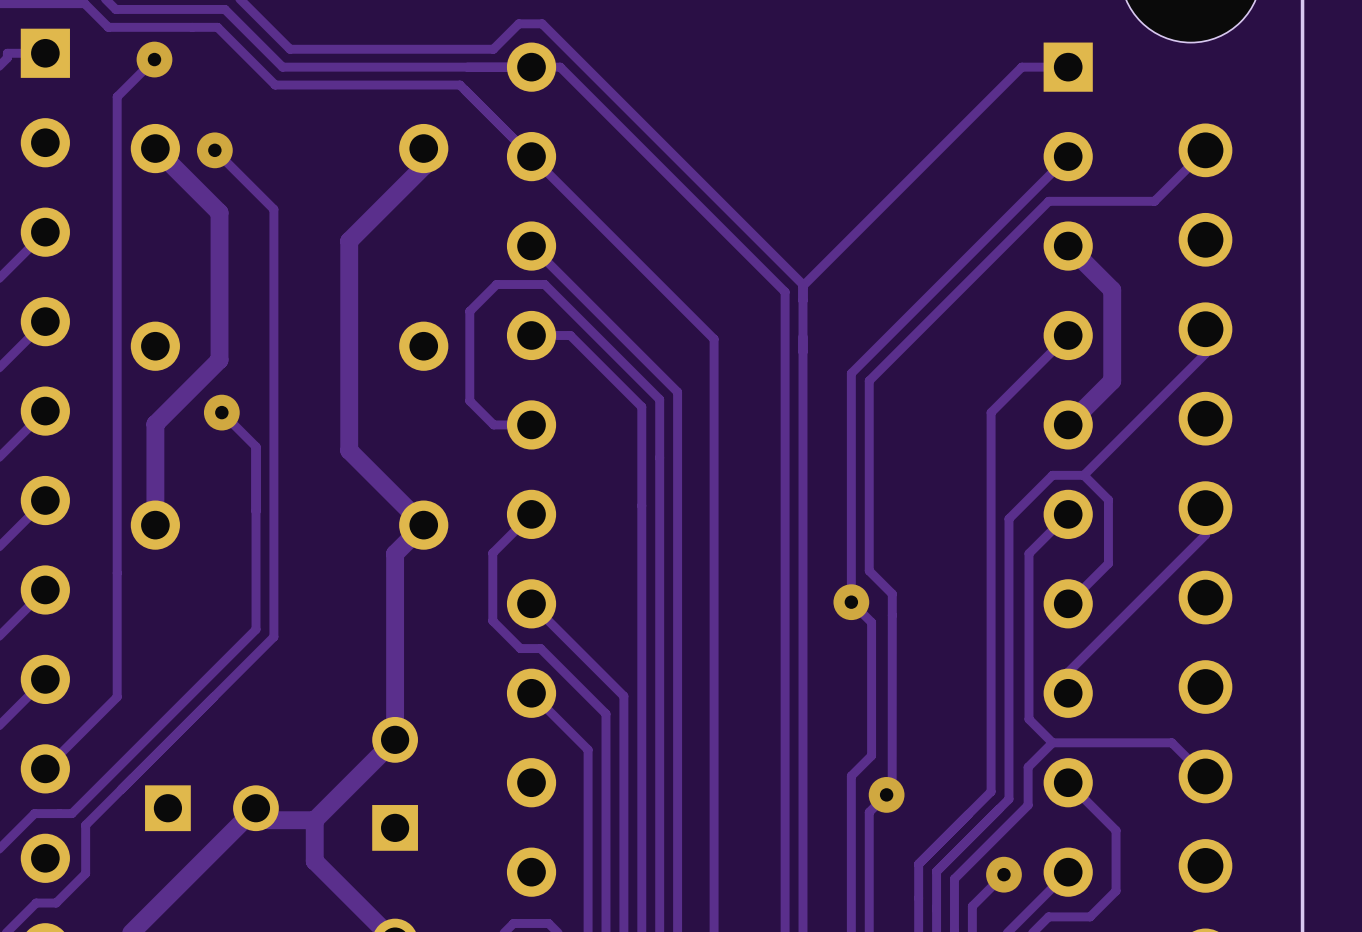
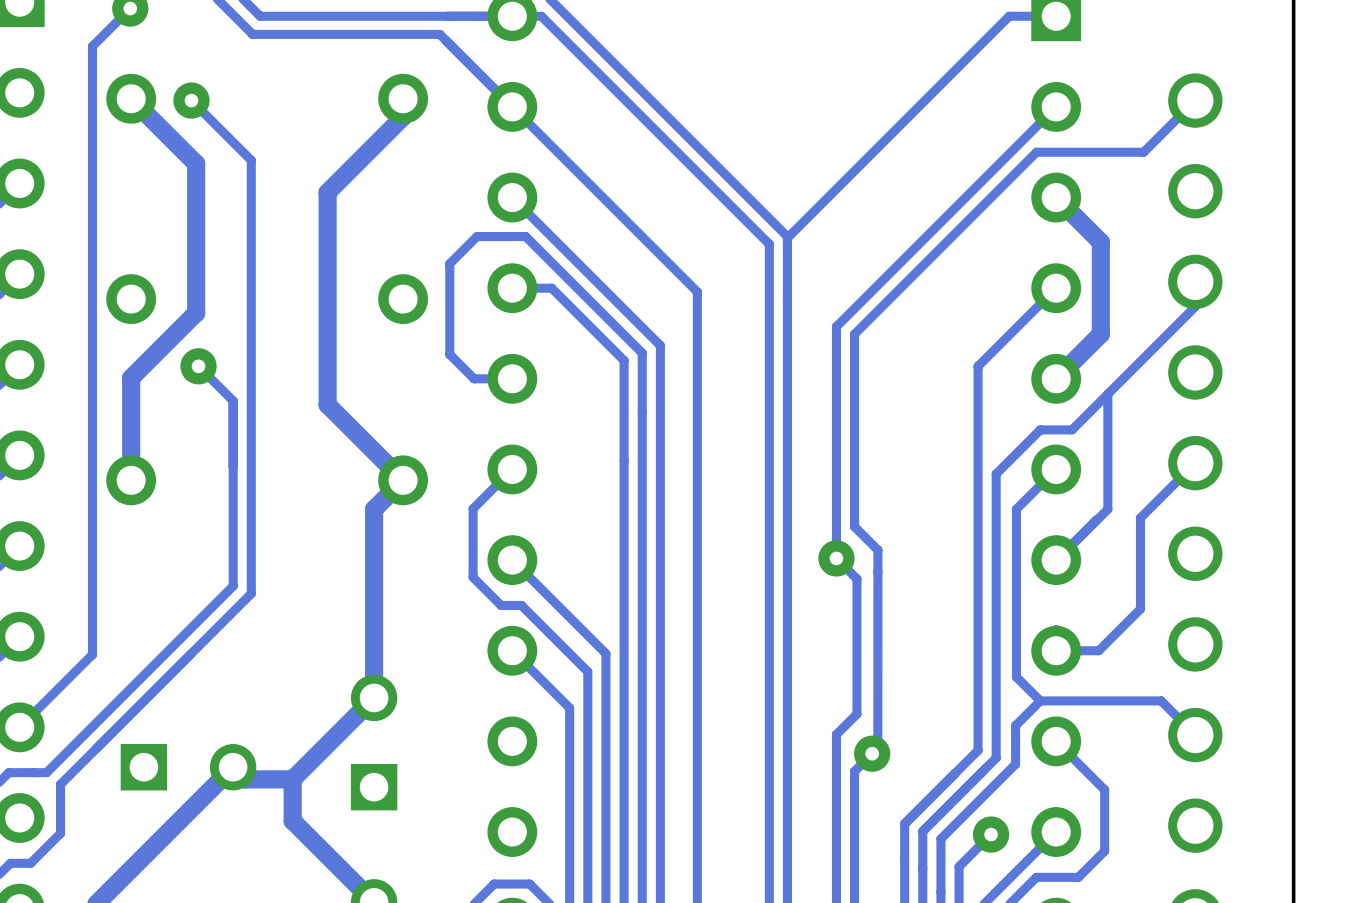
track: none -> (1107, 394) (1107, 509) (1056, 560)
track: (1083, 475) (1108, 499) (1108, 563) -> none
track: (1205, 508) (1205, 534) (1068, 672) -> (1195, 463) (1140, 517) (1140, 609) (1098, 650) (1056, 650)

